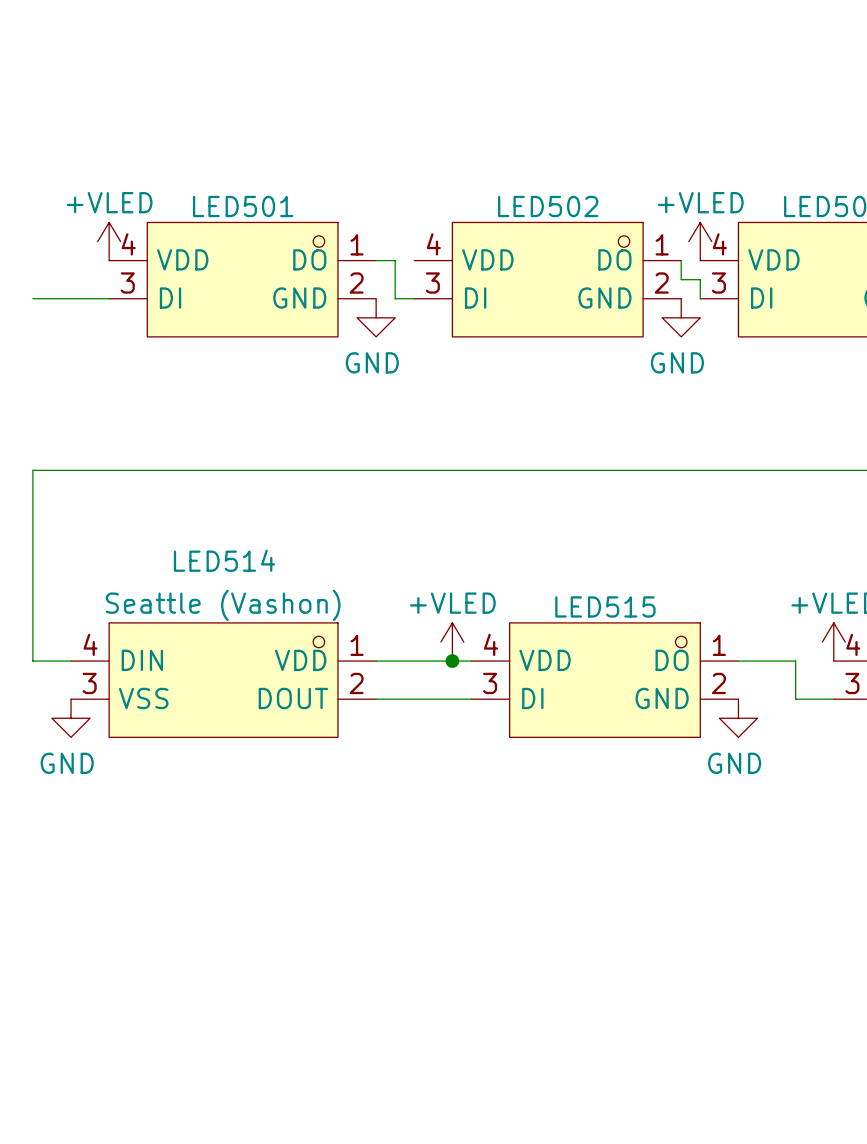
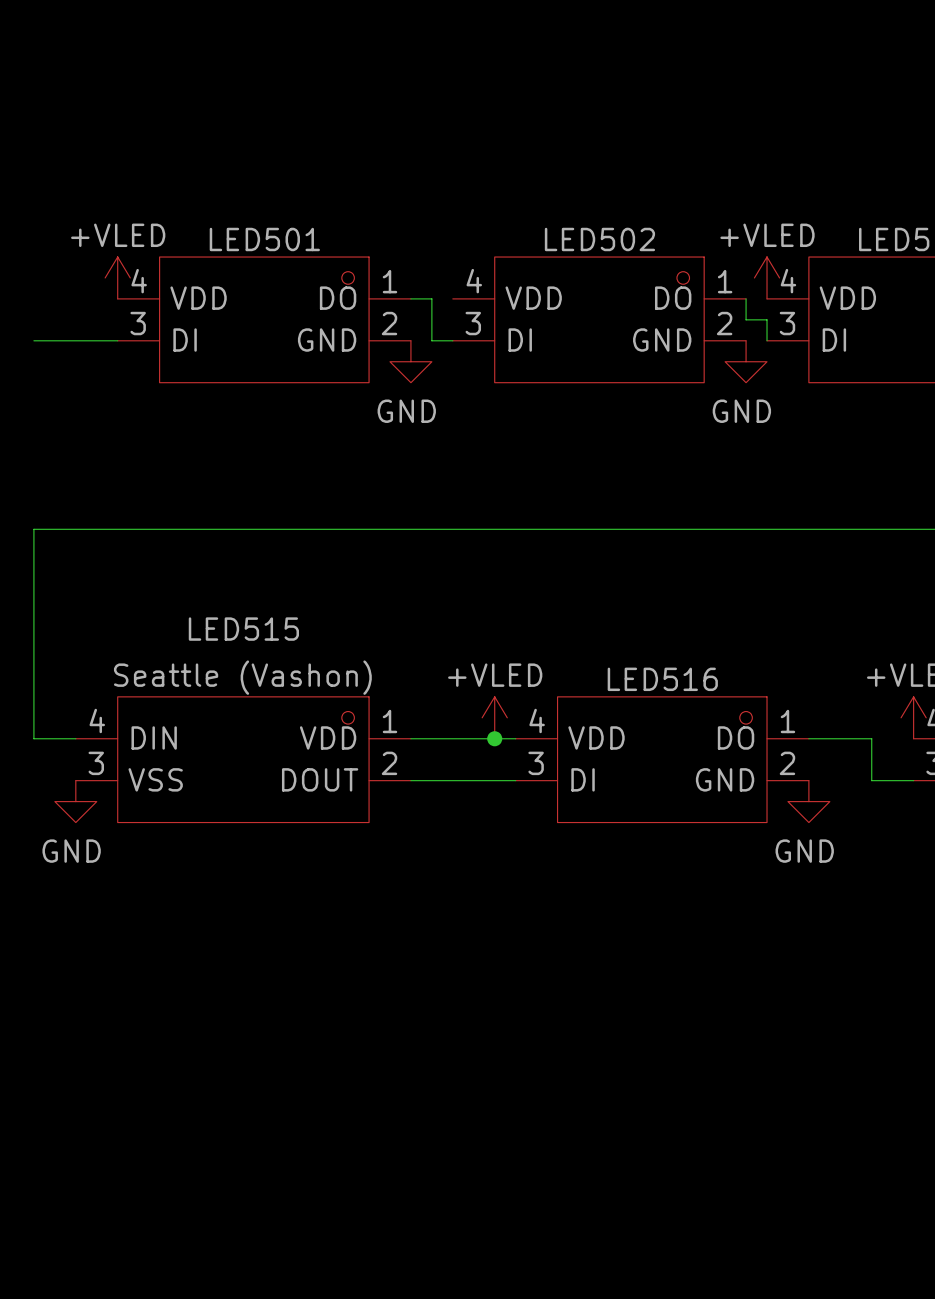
LED514 name: LED514 (224, 560) -> LED515 (243, 629)
LED515 name: LED515 (605, 606) -> LED516 (662, 679)

